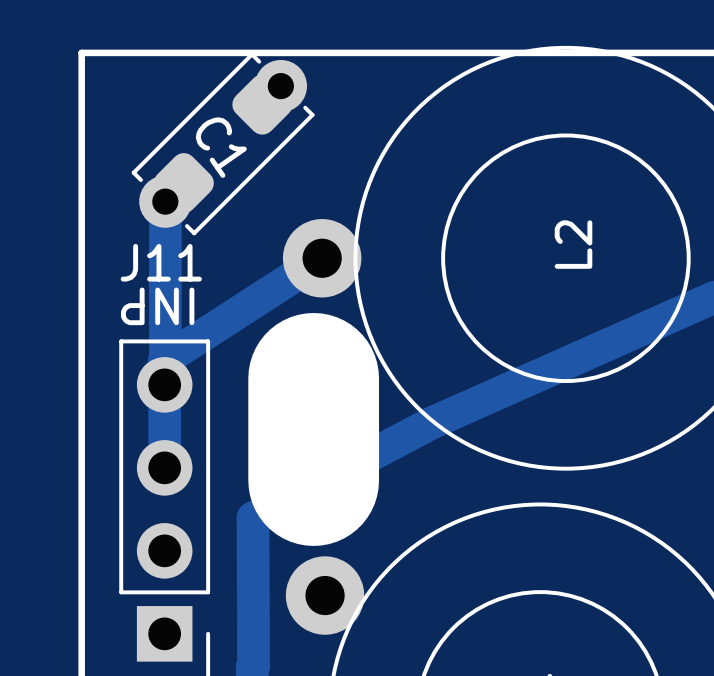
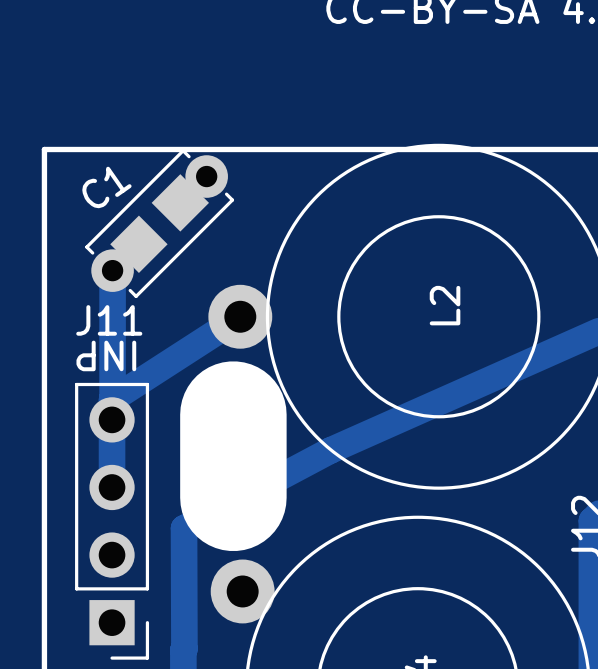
part footprint: [131, 52, 315, 236] -> [85, 149, 235, 299]
text rotation: 0° (221, 147) -> 90° counterclockwise (106, 187)

